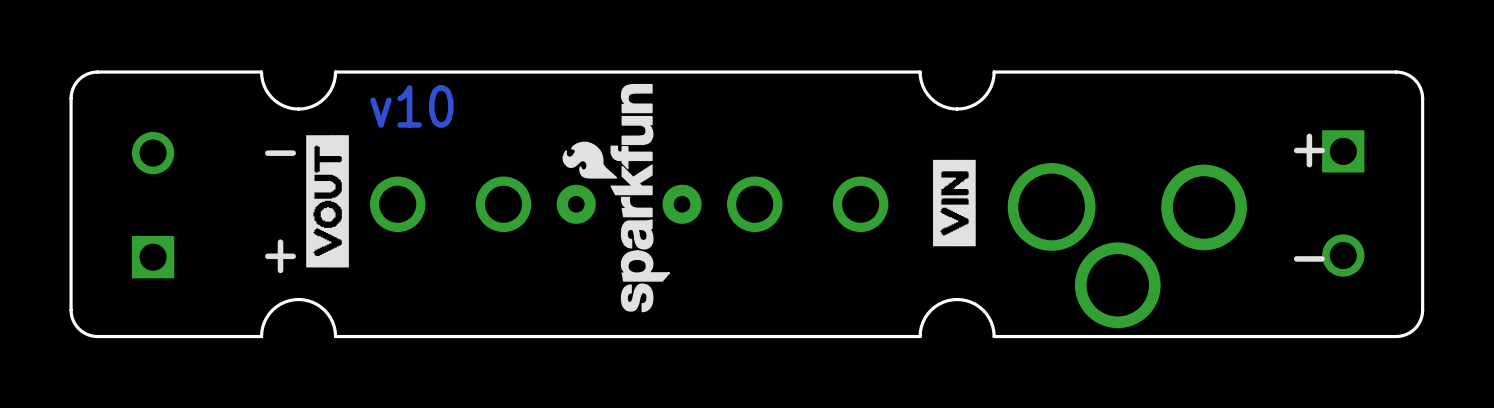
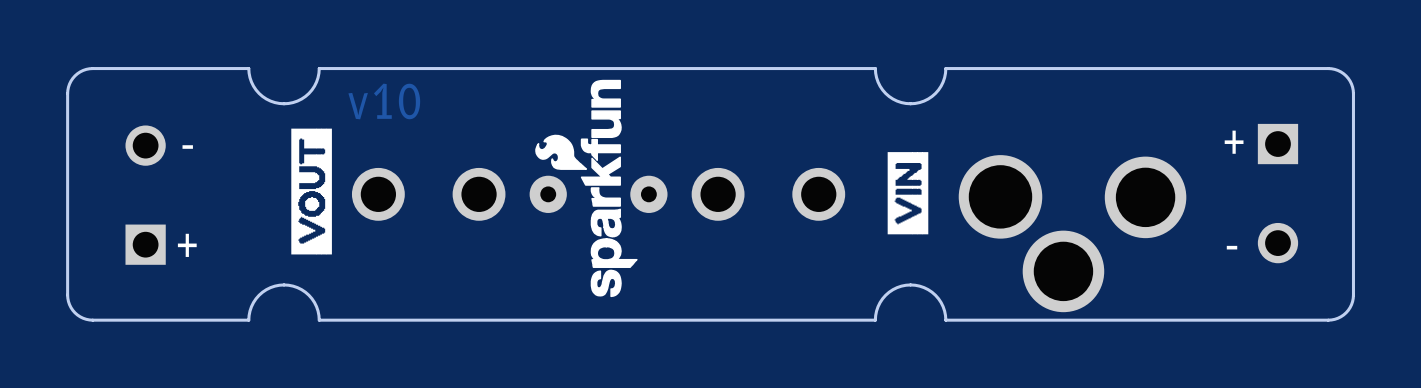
text position: - (280, 153) -> - (187, 147)
text position: + (280, 256) -> + (187, 245)

